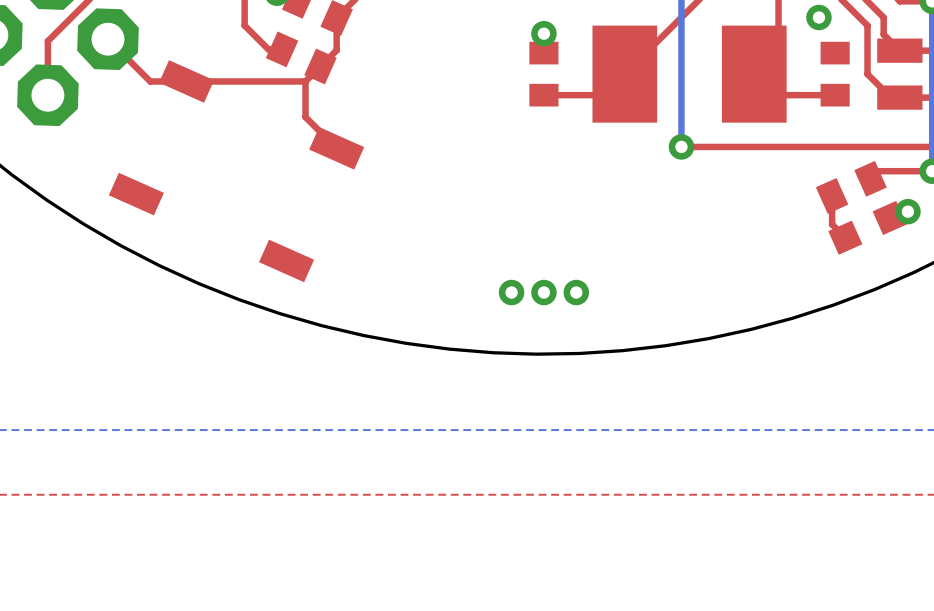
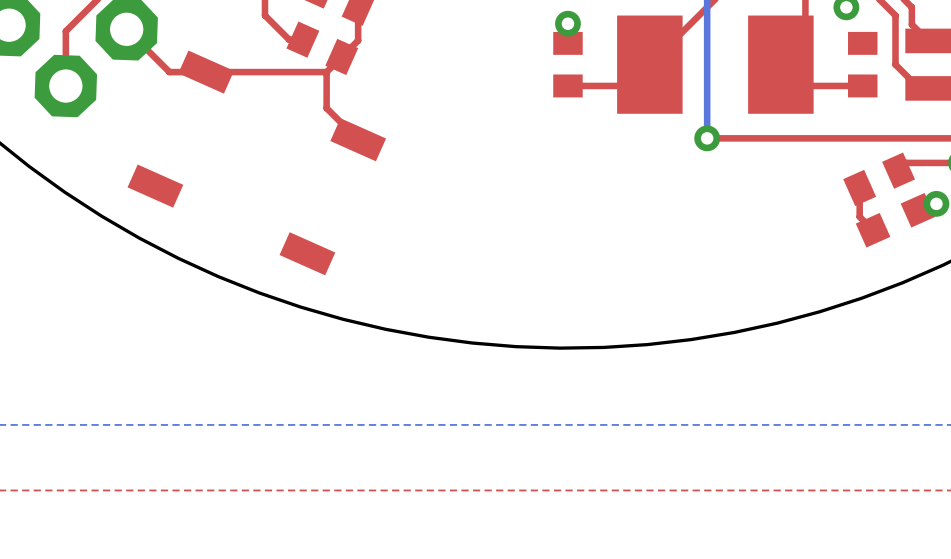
via: (511, 292) -> none
via: (543, 292) -> none
via: (576, 292) -> none

